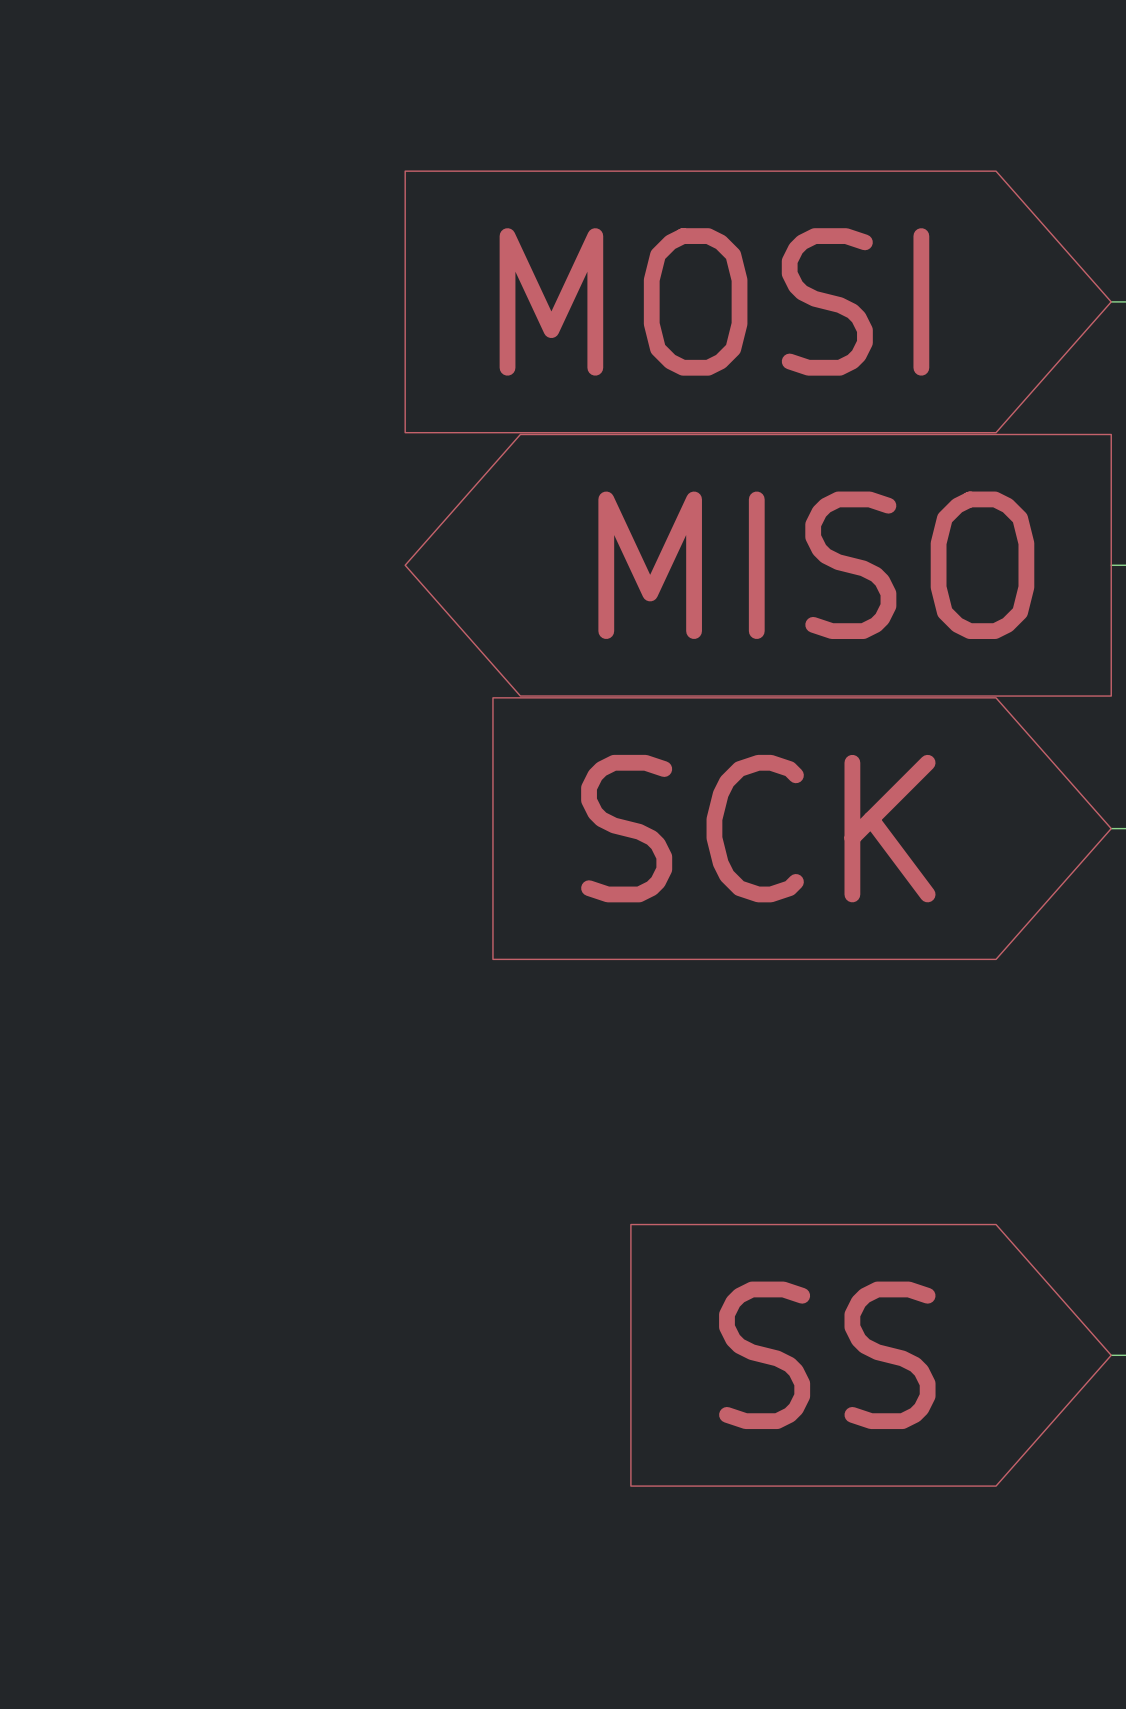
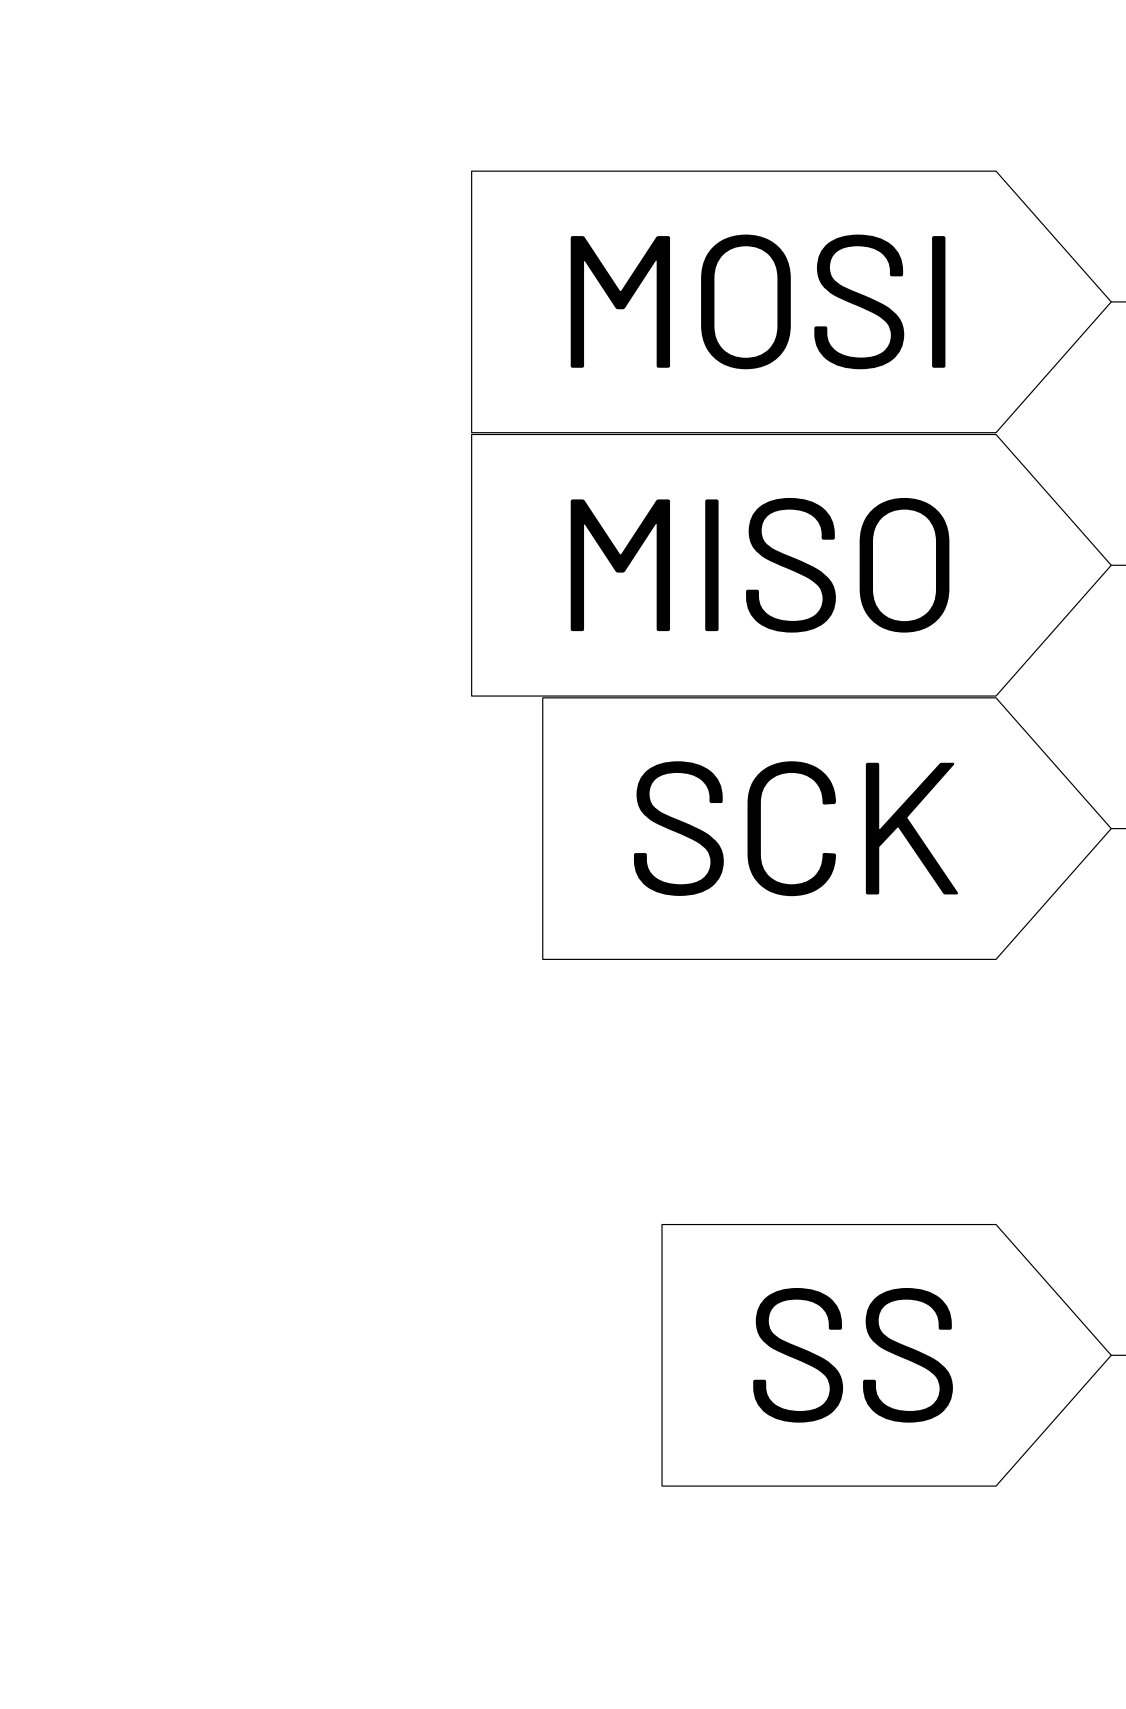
global label shape: output (816, 565) -> input (760, 565)

